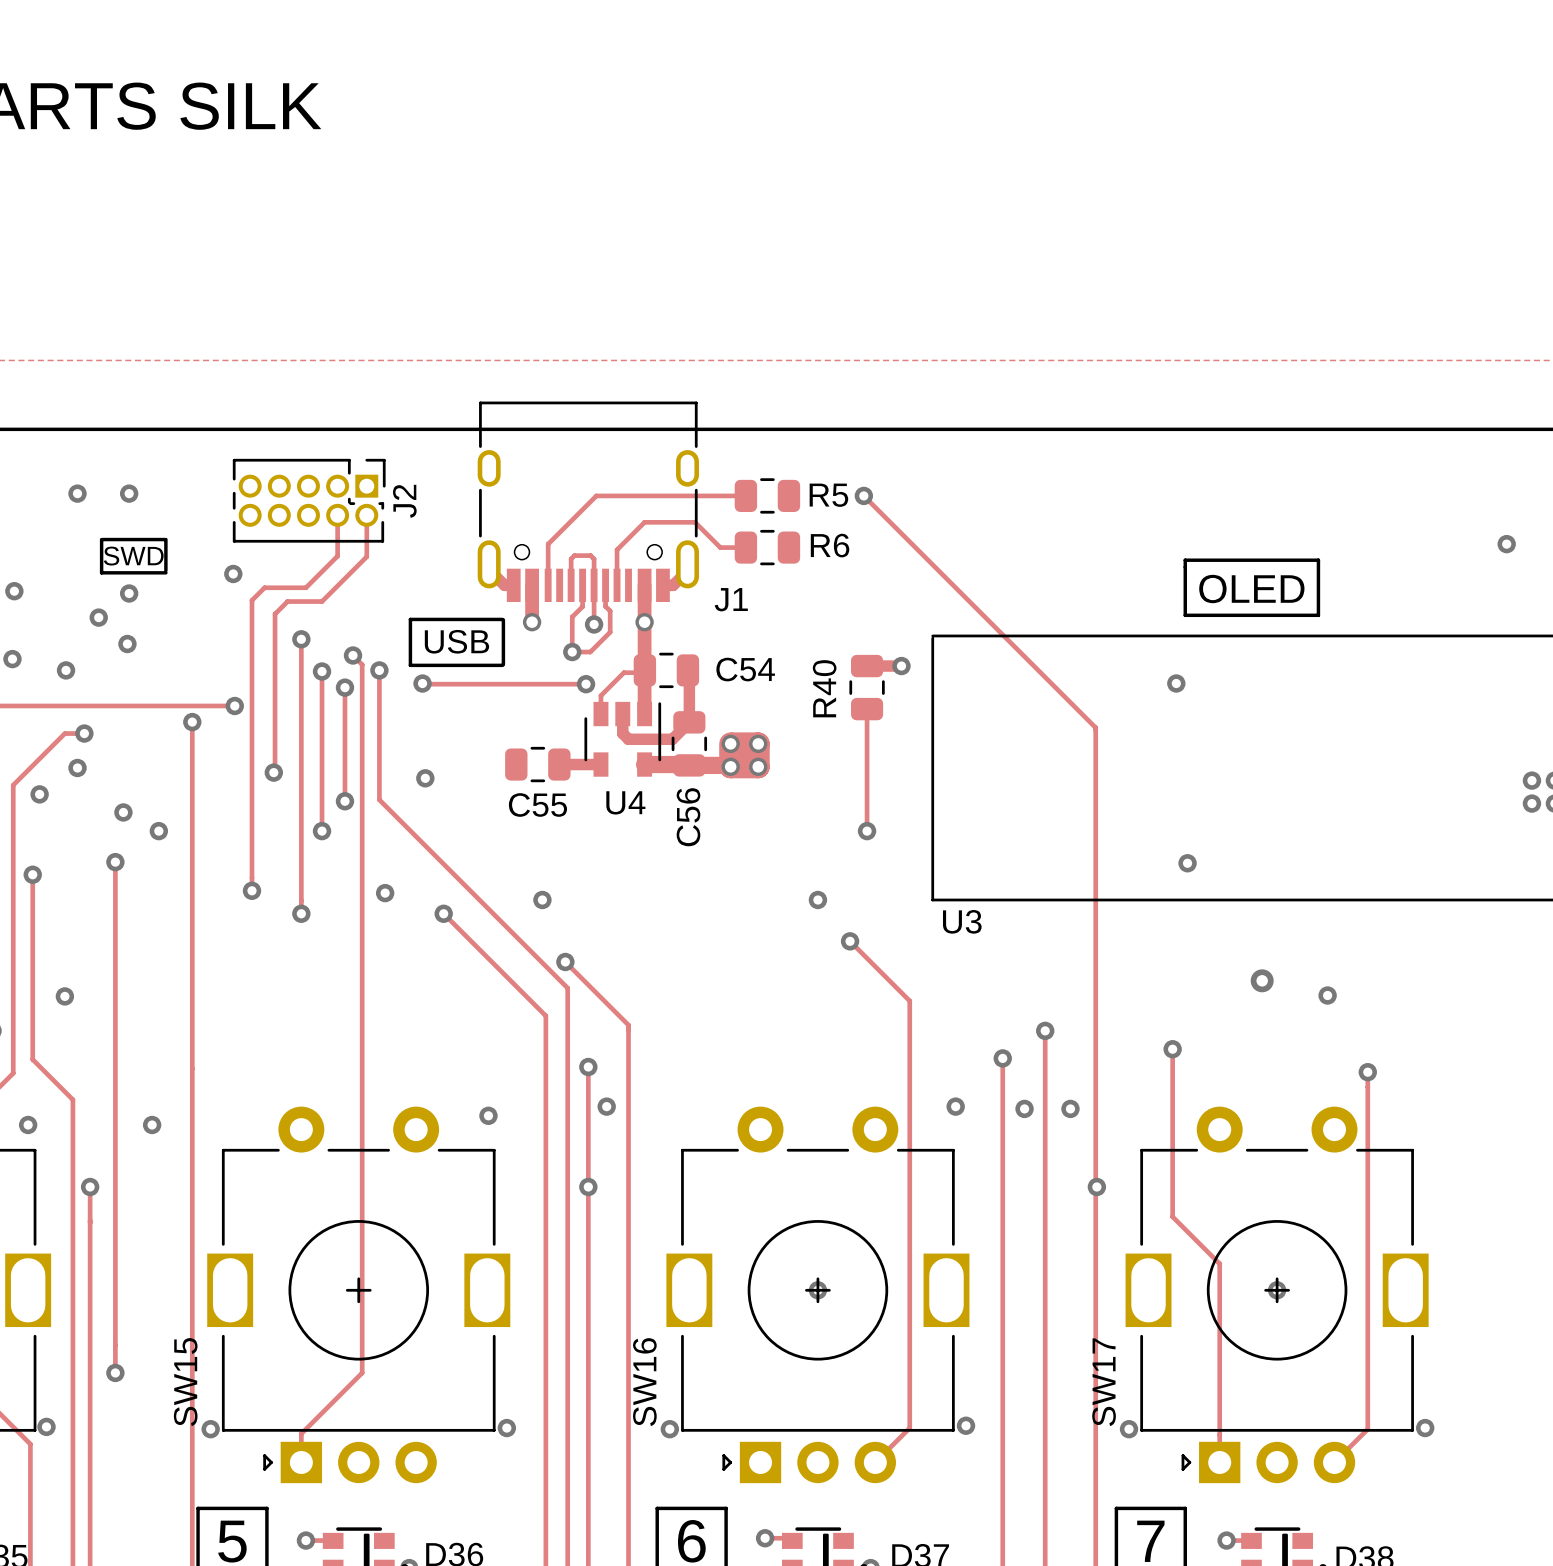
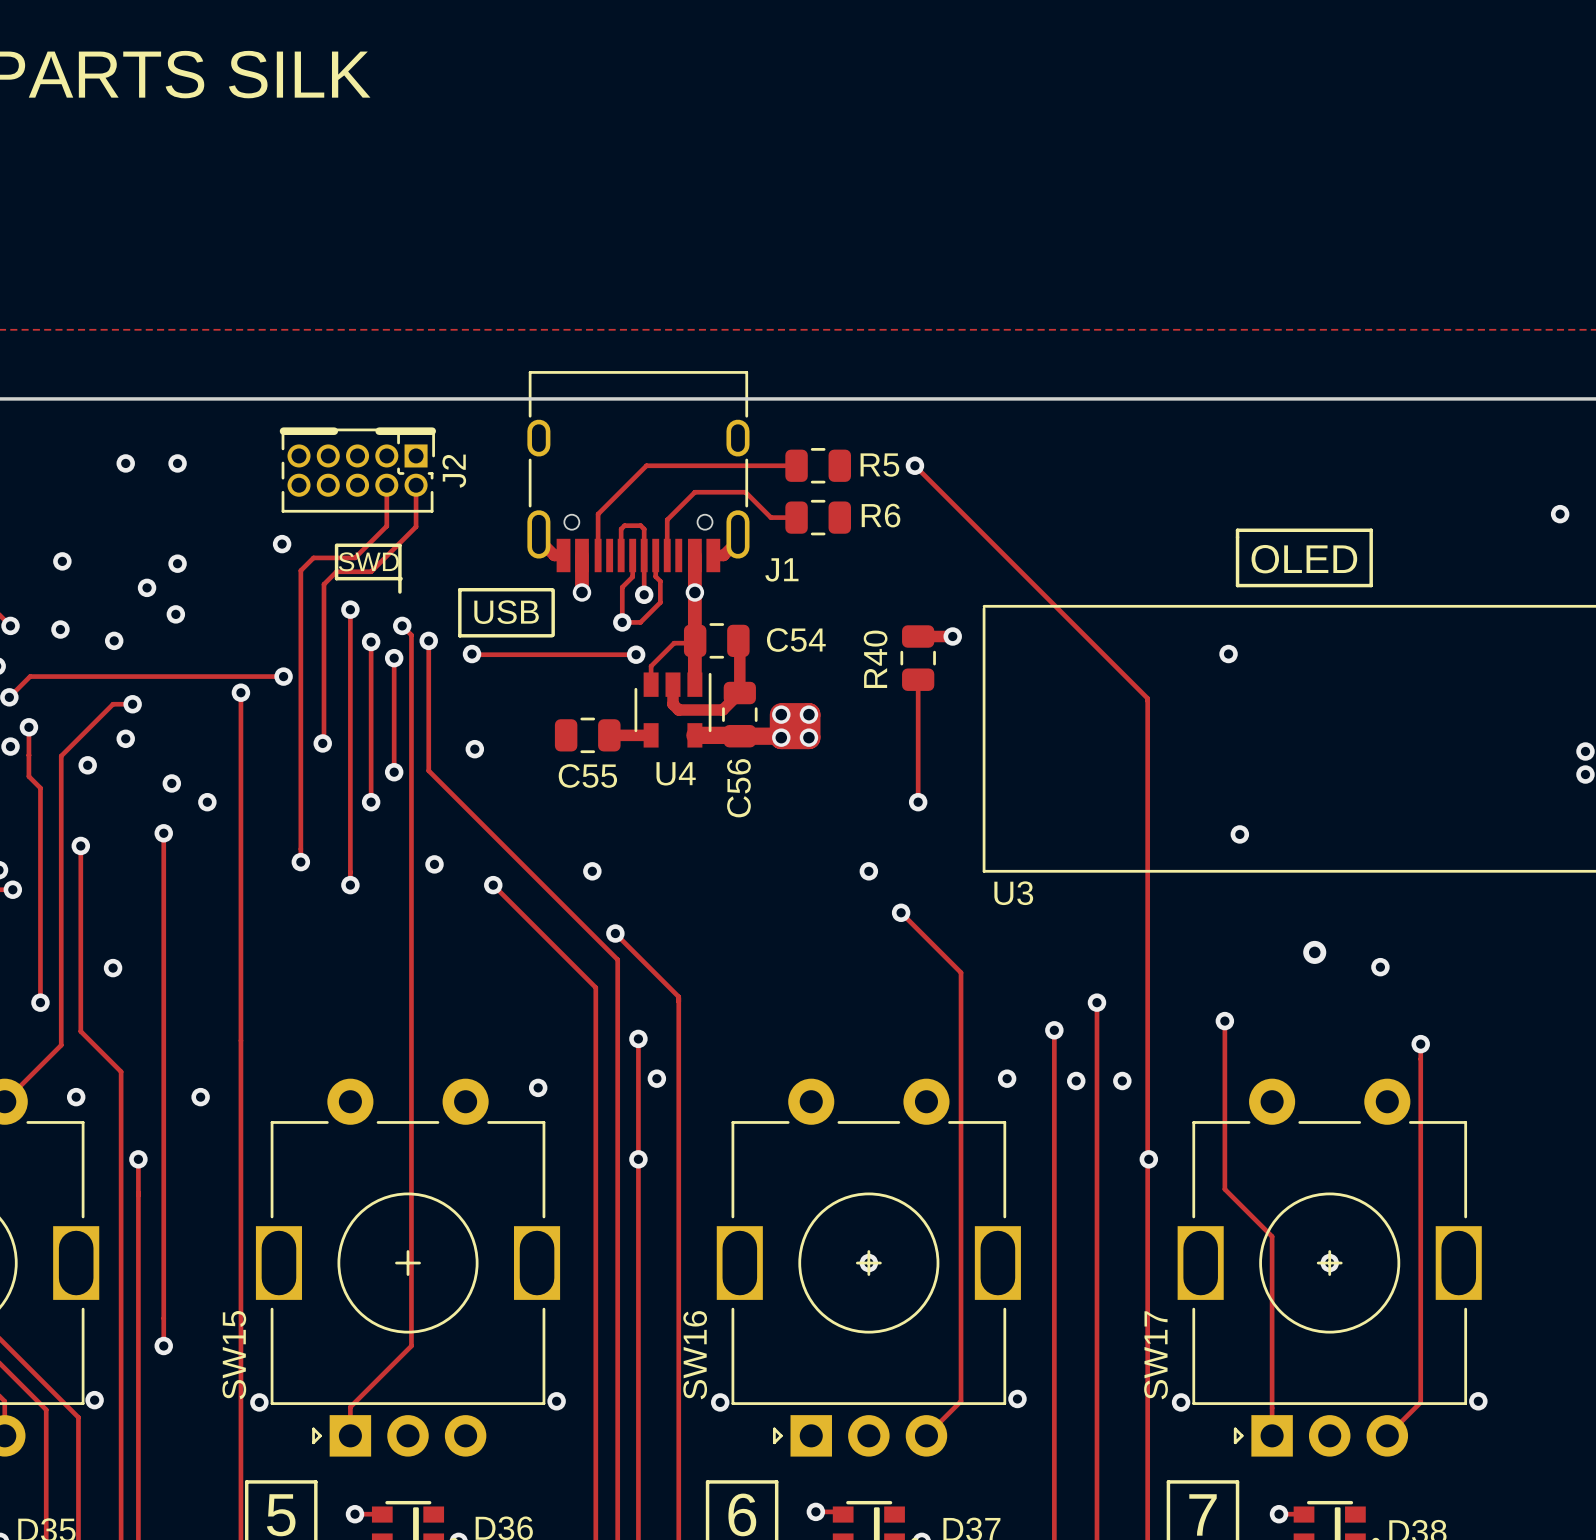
line: none -> (283, 431) (334, 431)
line: none -> (379, 431) (432, 431)
line: (101, 539) (101, 572) (165, 572) -> (336, 545) (336, 578) (401, 578)
line: (102, 539) (164, 539) -> (337, 545) (399, 545)
line: (165, 539) (165, 570) -> none
text position: SWD (133, 556) -> SWD (368, 561)
line: none -> (399, 545) (399, 592)

